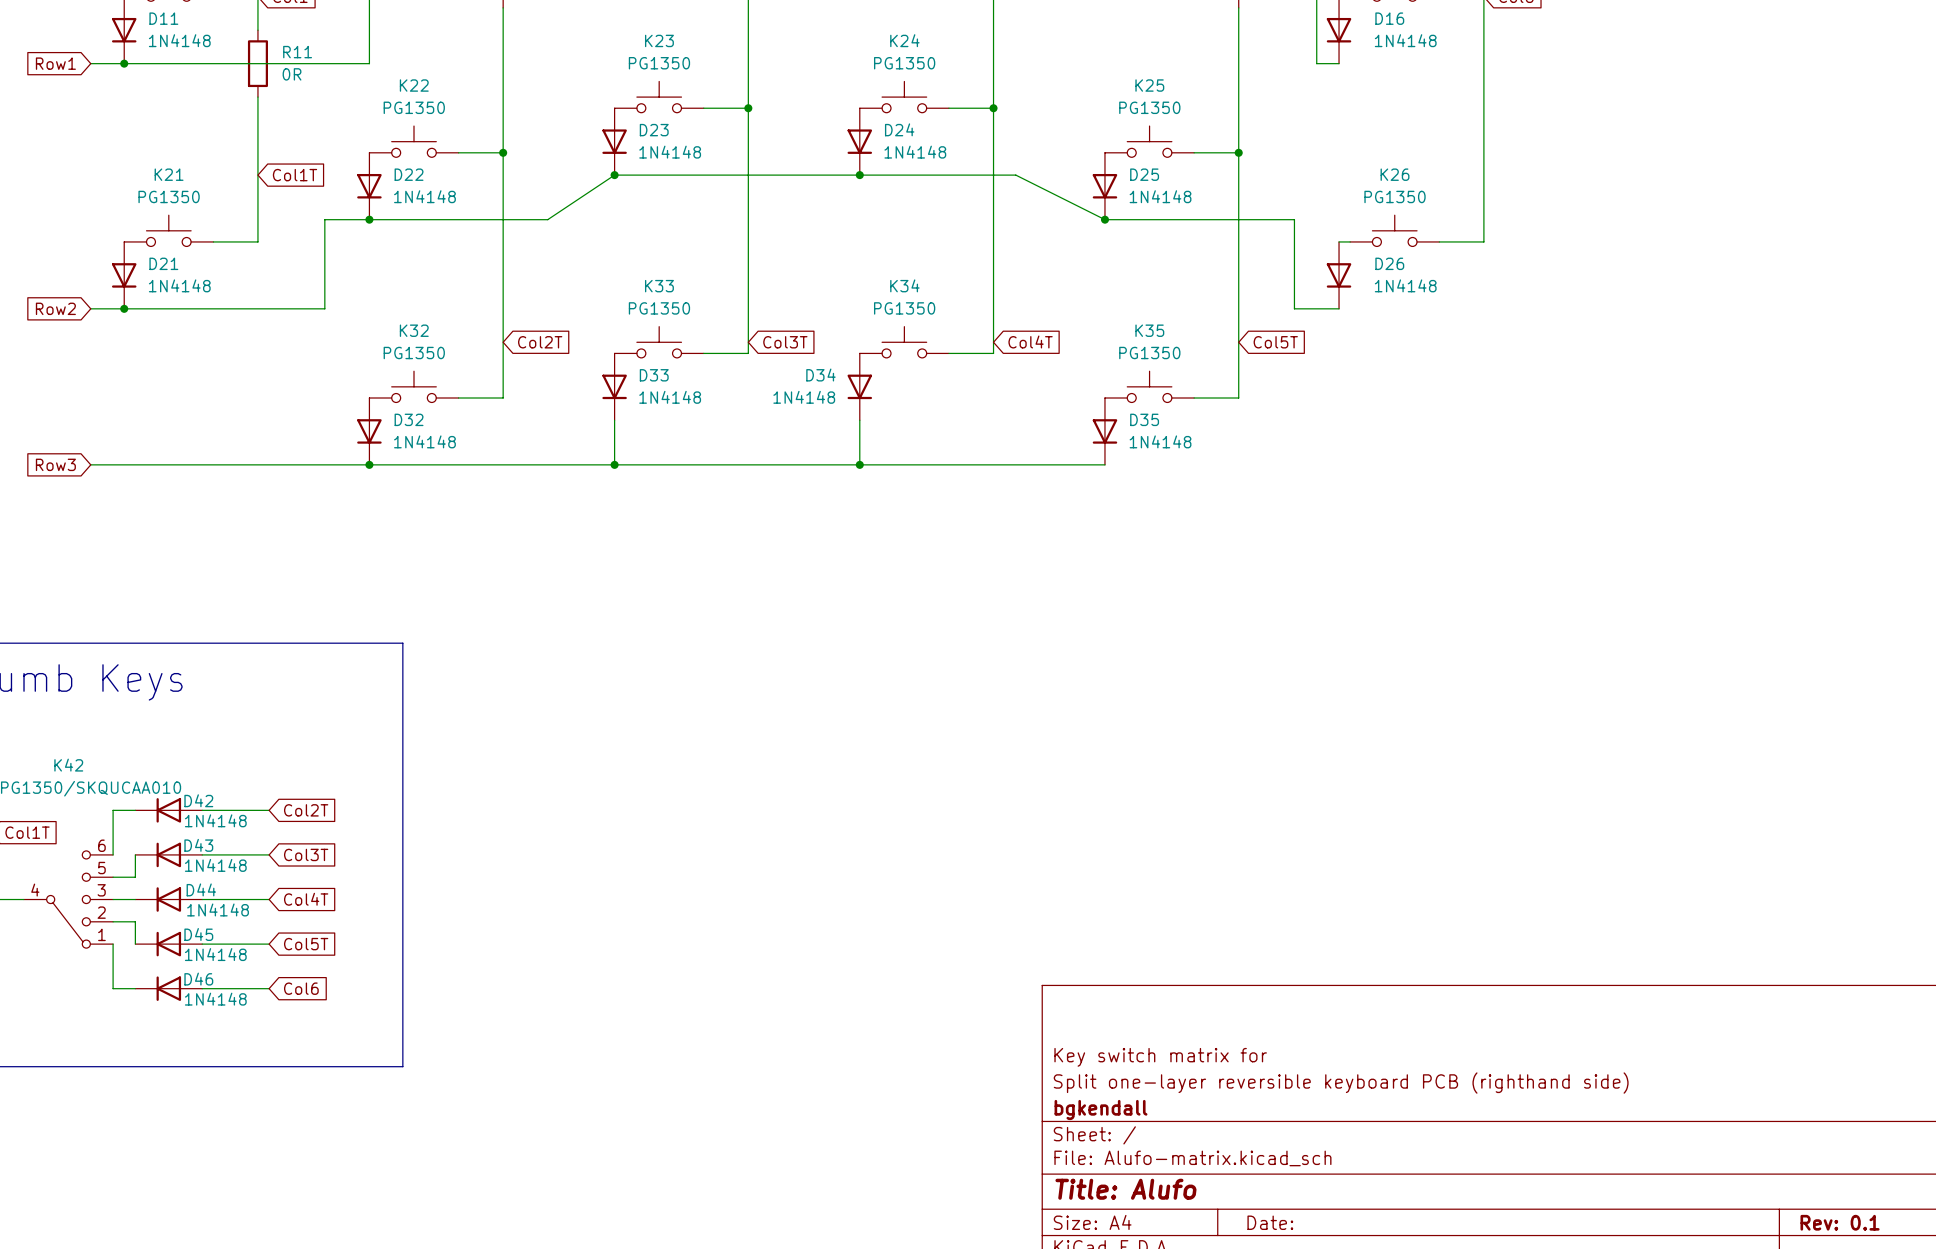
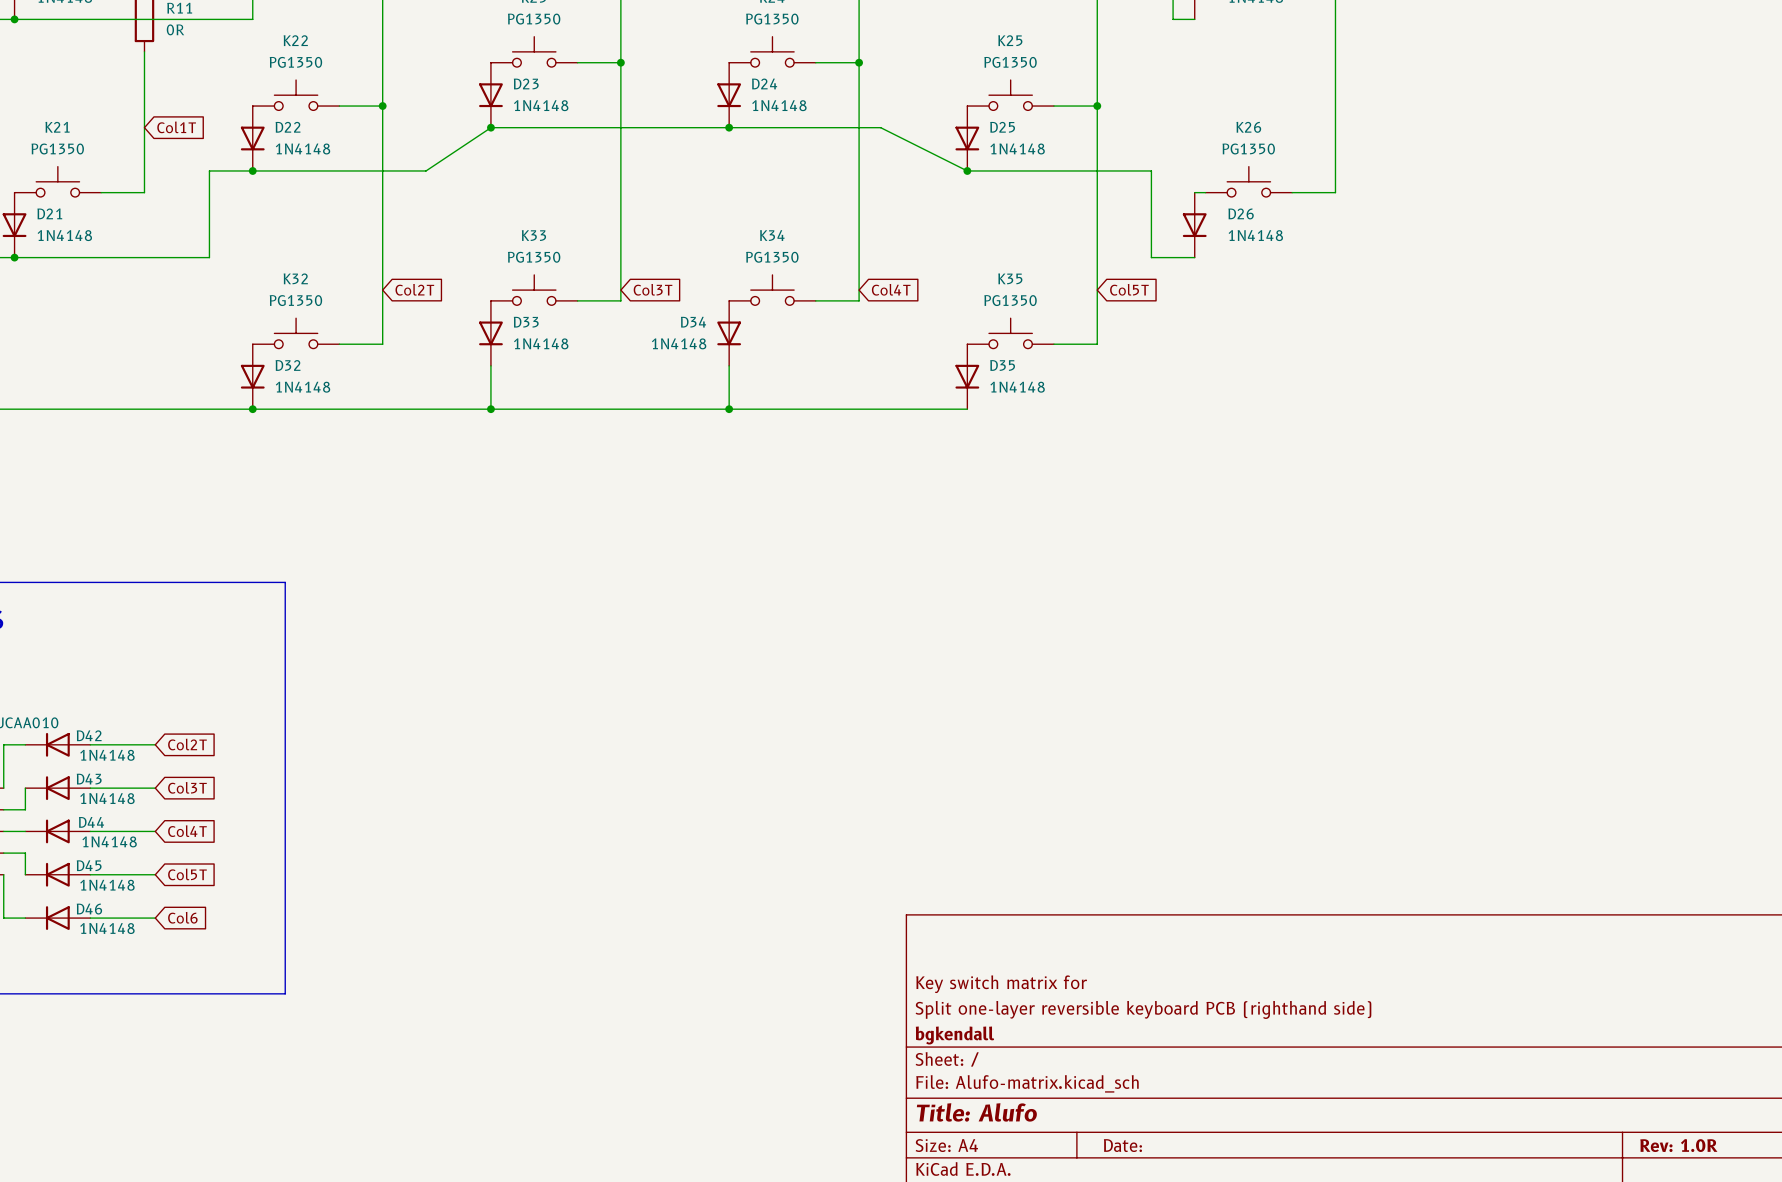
title block: Rev: 0.1 (1840, 1222) -> Rev: 1.0R (1678, 1145)

